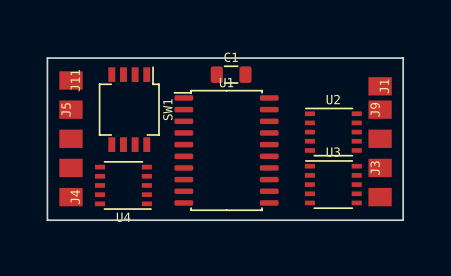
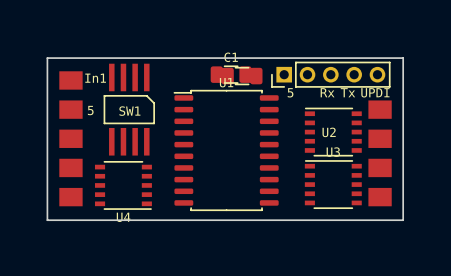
SW1 footprint: [99, 66, 160, 152] -> [103, 63, 155, 156]
part: none -> (330, 74)
part: none -> (242, 76)
text: none -> In1 (95, 78)
J11 name: J11 (75, 80) -> none
J1: (380, 86) -> none
text: none -> 5 (290, 92)
text: none -> Rx (327, 92)
text: none -> Tx (347, 92)
text: none -> UPDI (375, 92)
U2 name position: U2 (333, 99) -> U2 (329, 132)
J5 name: J5 (66, 109) -> none
SW1 name position: SW1 (167, 109) -> SW1 (129, 111)
J9 name: J9 (375, 109) -> none
text: none -> 5 (90, 110)
J3 name: J3 (375, 168) -> none
J4 name: J4 (75, 197) -> none

